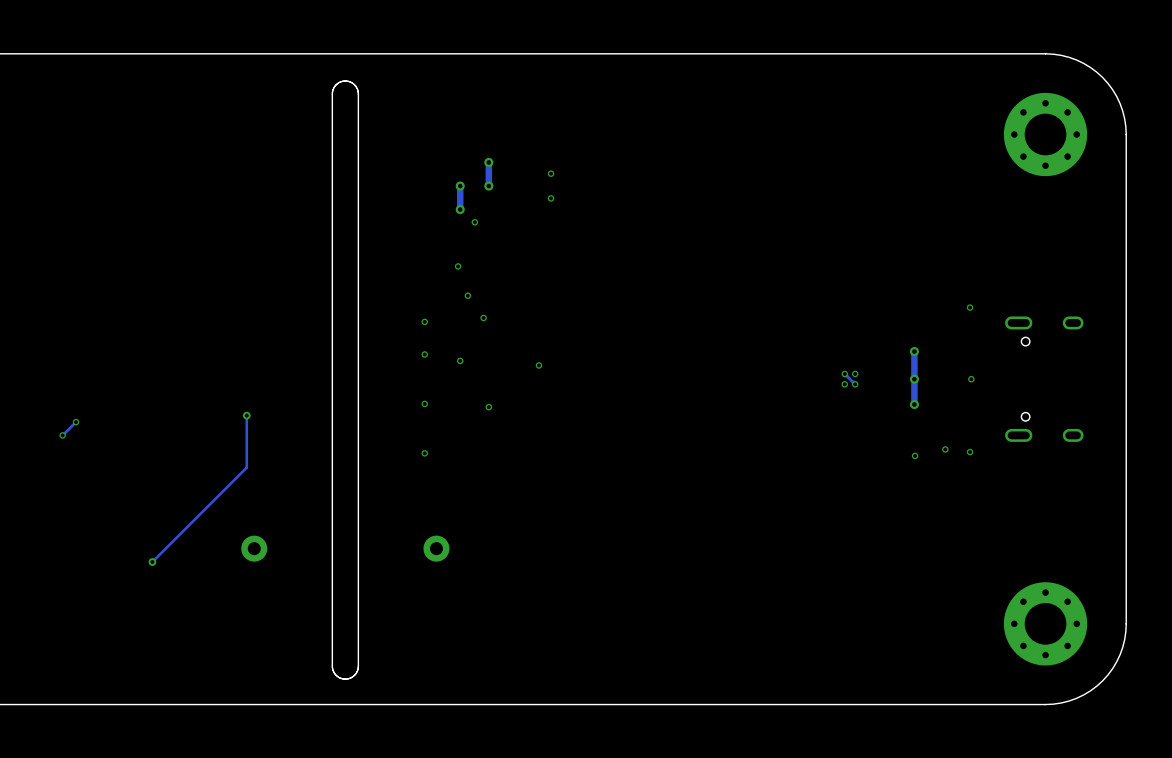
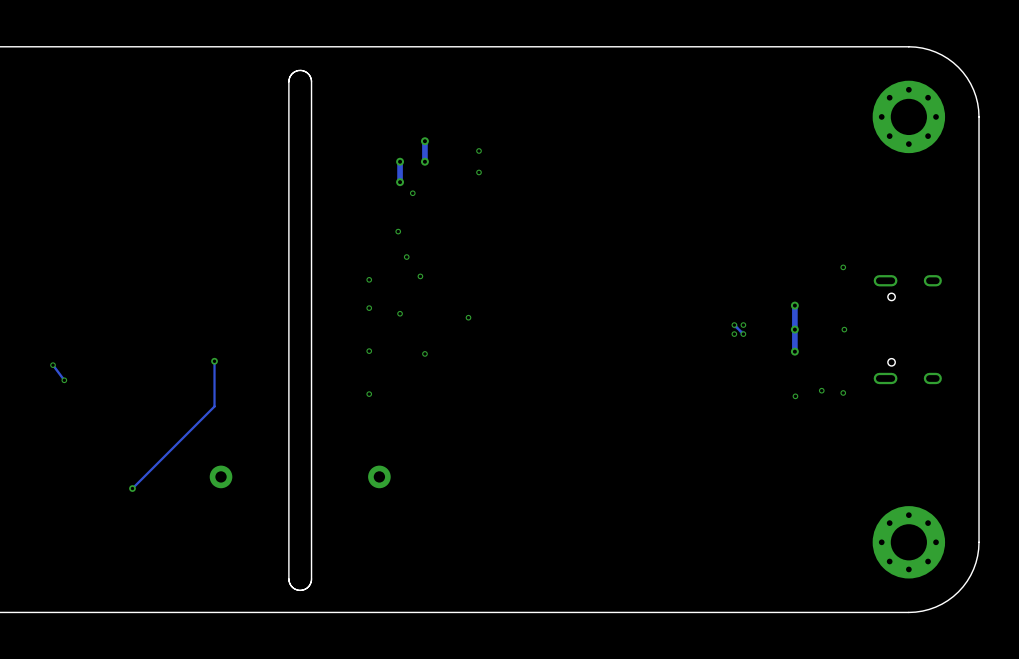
track: none -> (53, 365) (64, 380)
via: none -> (53, 365)
track: (76, 422) (62, 435) -> none
via: (76, 422) -> none
via: (62, 435) -> none
via: none -> (64, 380)

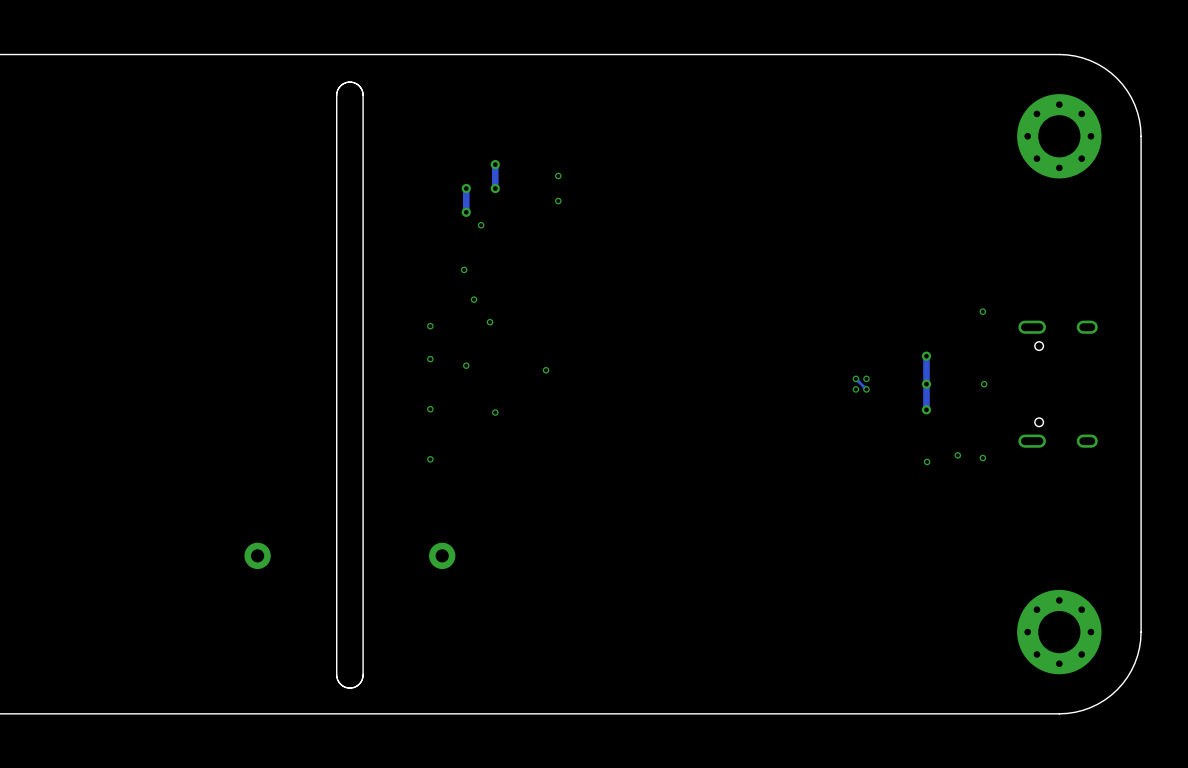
track: (214, 361) (214, 406) (132, 488) -> none
via: (214, 361) -> none
track: (53, 365) (64, 380) -> none
via: (53, 365) -> none
via: (64, 380) -> none
via: (132, 488) -> none

